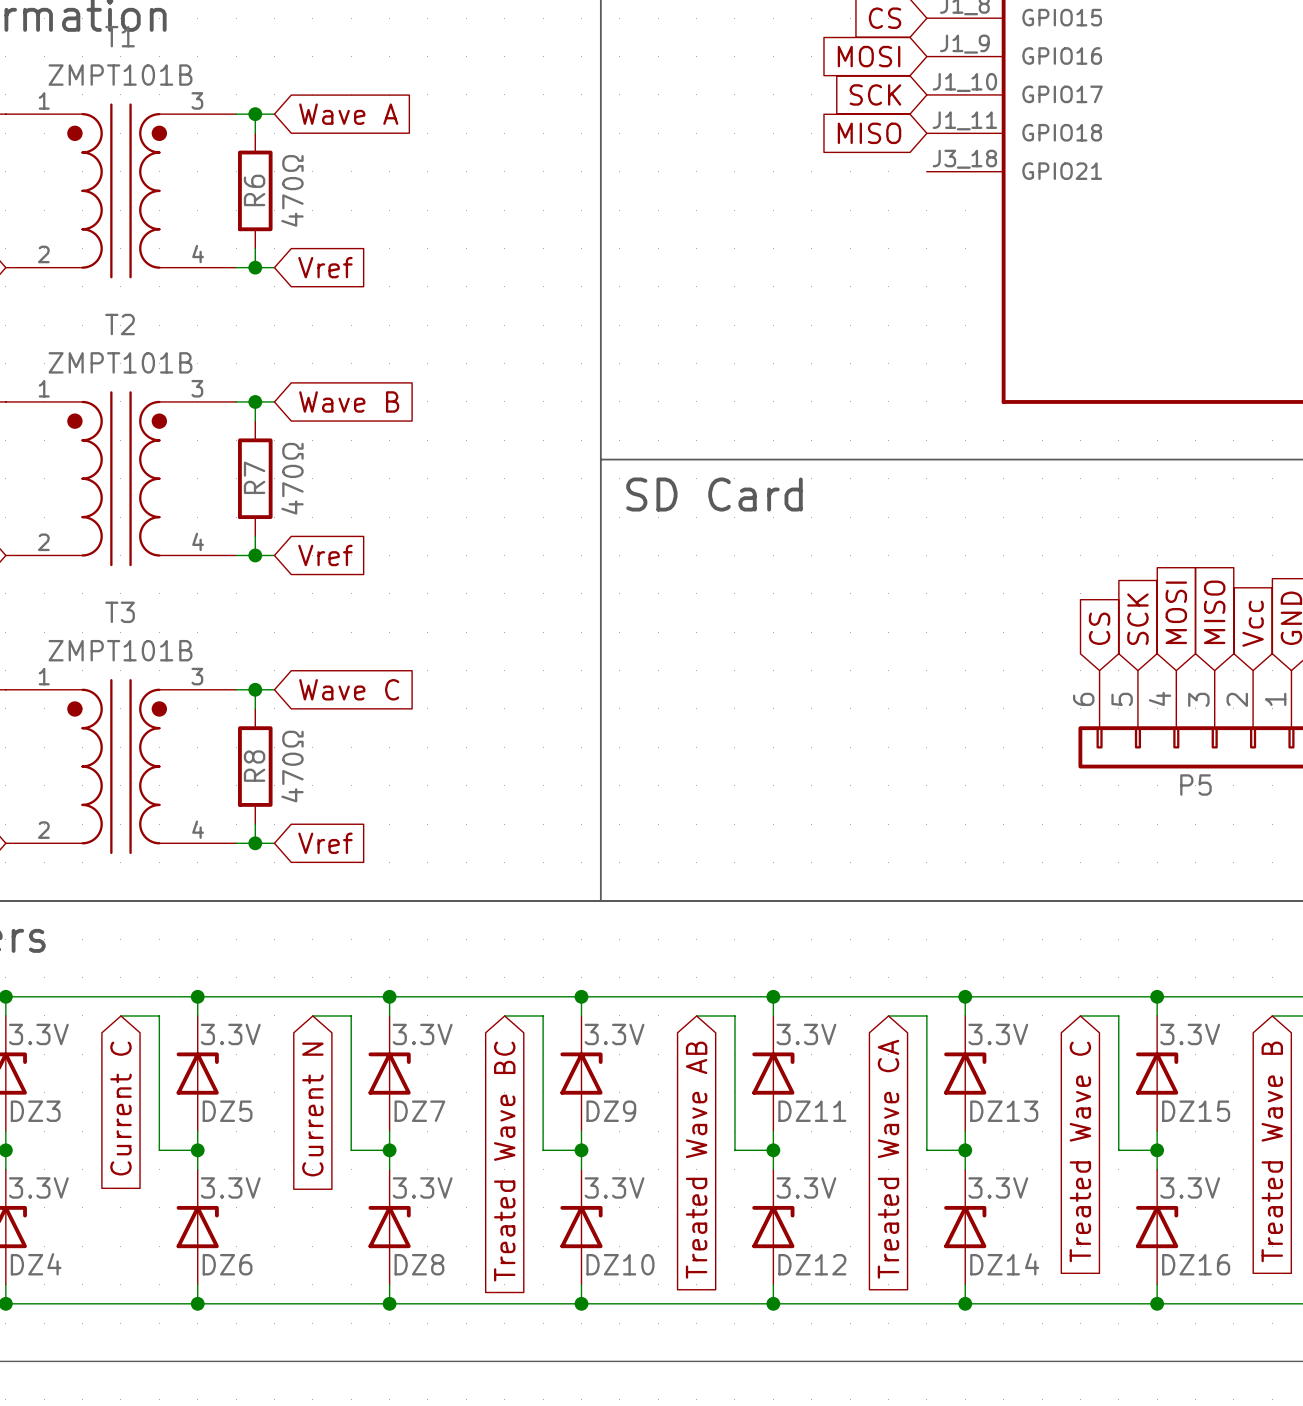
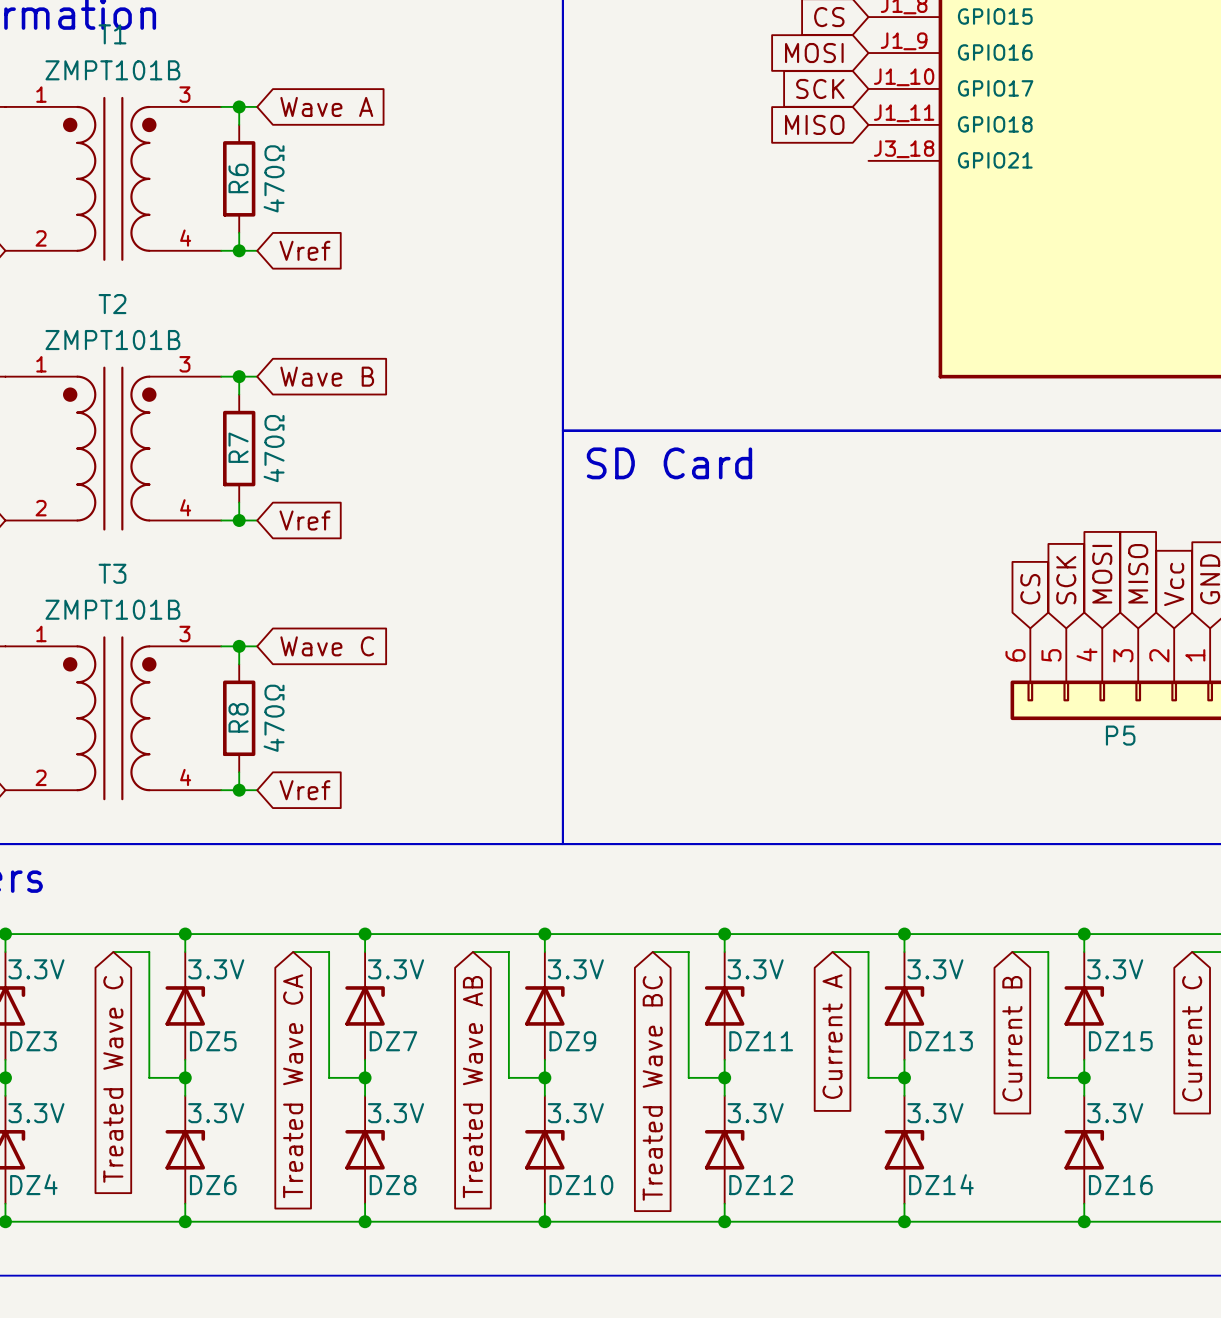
global label: Current C (120, 1108) -> Treated Wave C (113, 1079)
global label: Current N (312, 1109) -> Treated Wave CA (293, 1086)
global label: Treated Wave C (1080, 1151) -> Current B (1012, 1038)
global label: Treated Wave B (1272, 1151) -> Current C (1192, 1038)
global label: Treated Wave CA (888, 1159) -> Current A (832, 1036)
global label: Treated Wave AB (696, 1160) -> Treated Wave BC (652, 1088)
global label: Treated Wave BC (504, 1161) -> Treated Wave AB (472, 1087)

